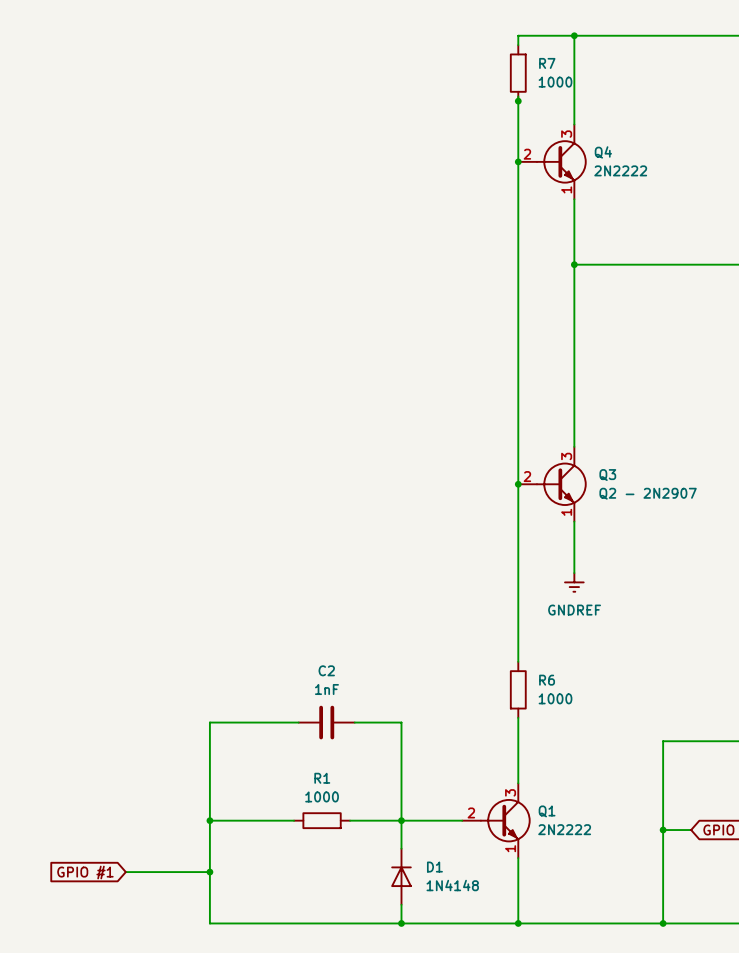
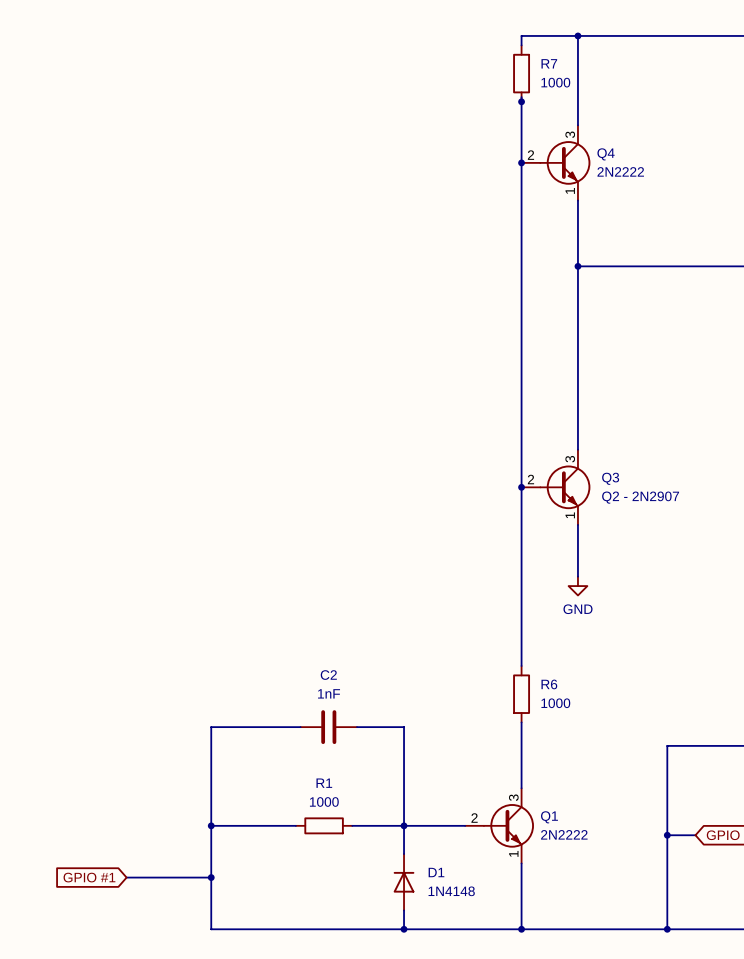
power symbol: GNDREF (574, 582) -> GND (577, 586)

